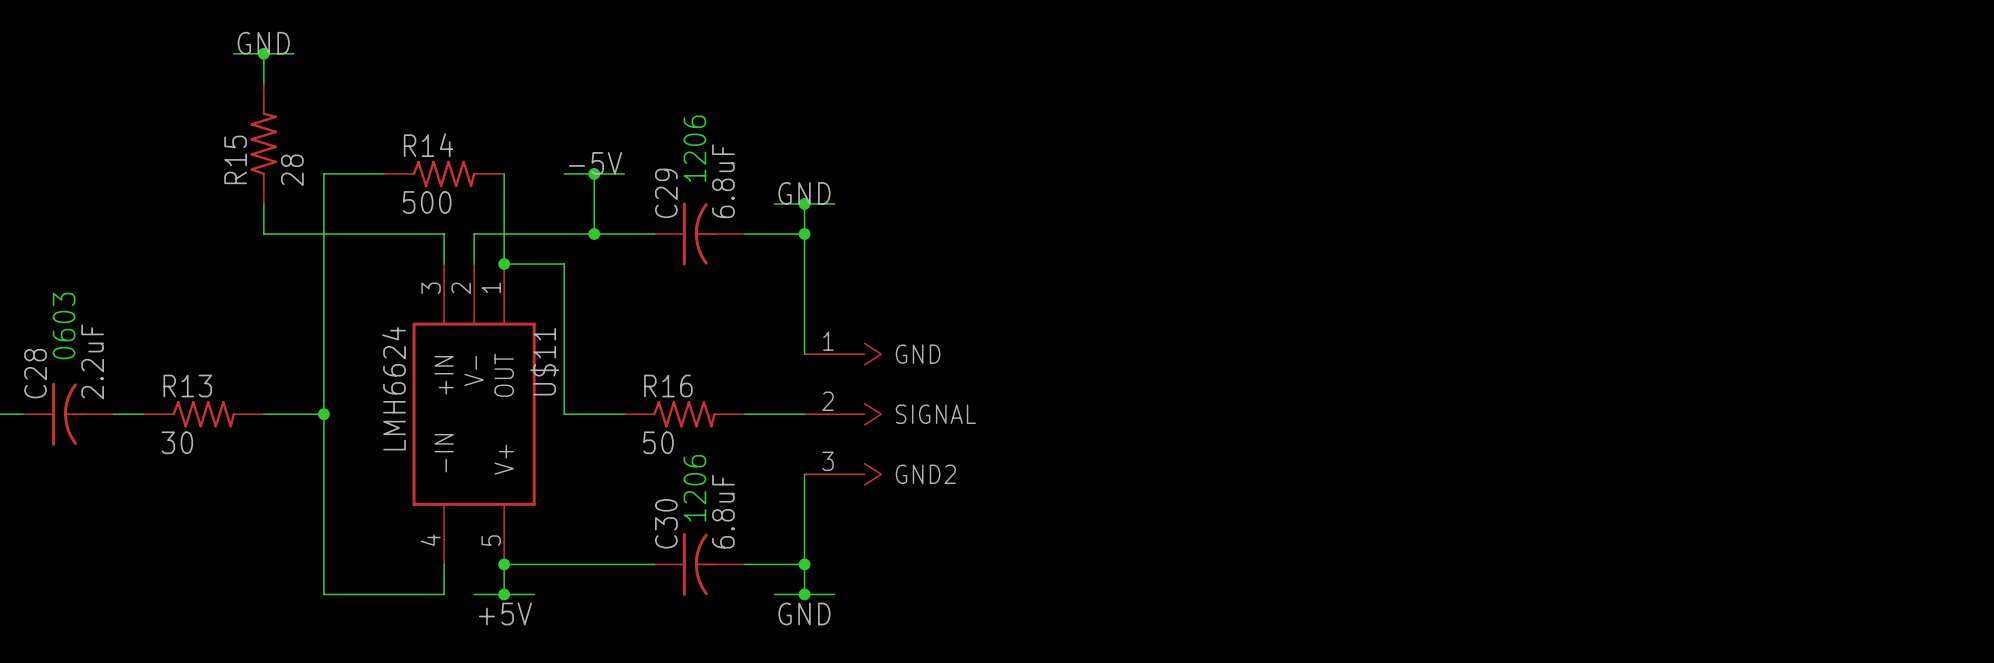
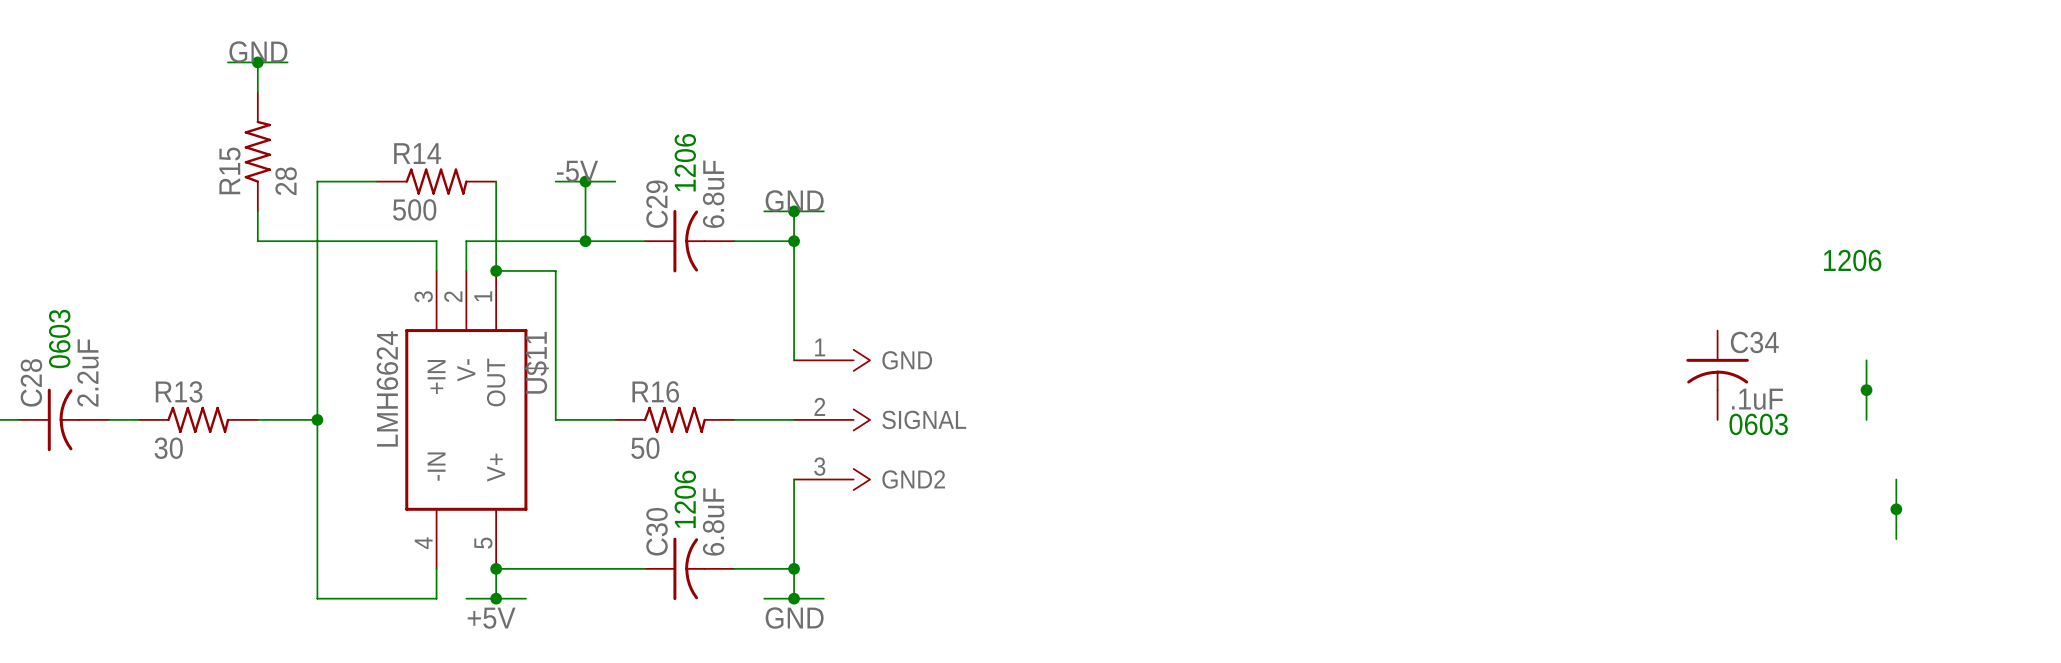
text: none -> 1206 (1852, 260)
wire: none -> (1866, 360) (1866, 419)
C34: none -> .1uF (1717, 375)
junction: none -> (1866, 390)
text: none -> 0603 (1758, 424)
wire: none -> (1896, 479) (1896, 539)
junction: none -> (1896, 509)

